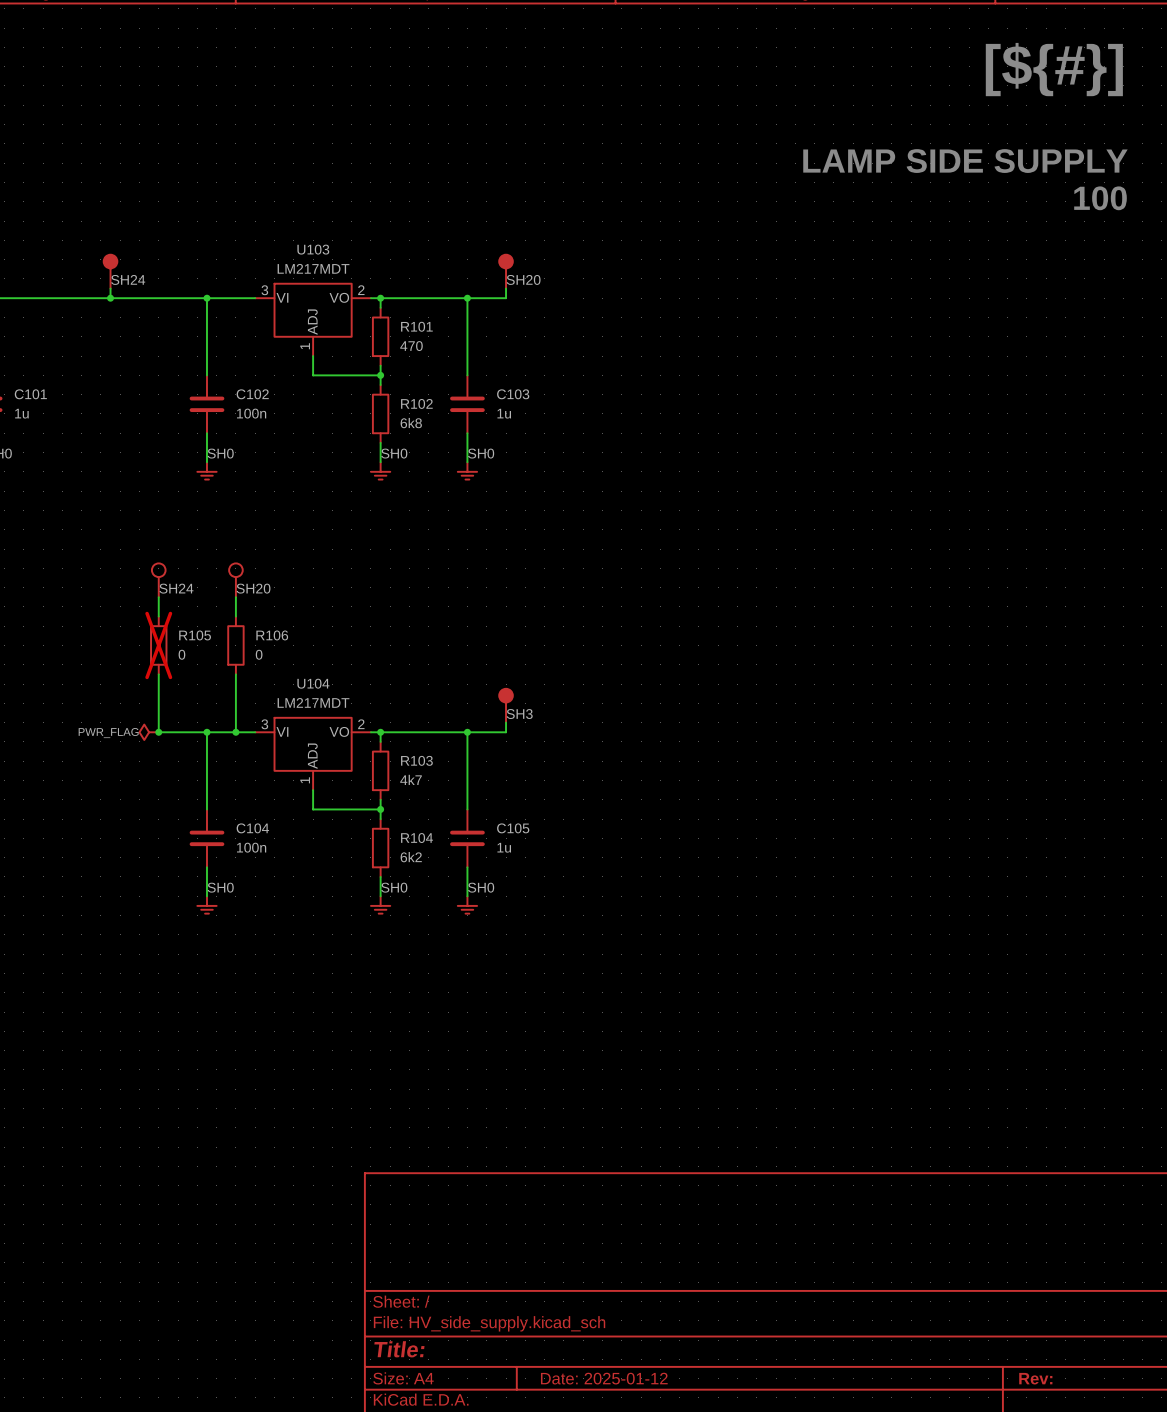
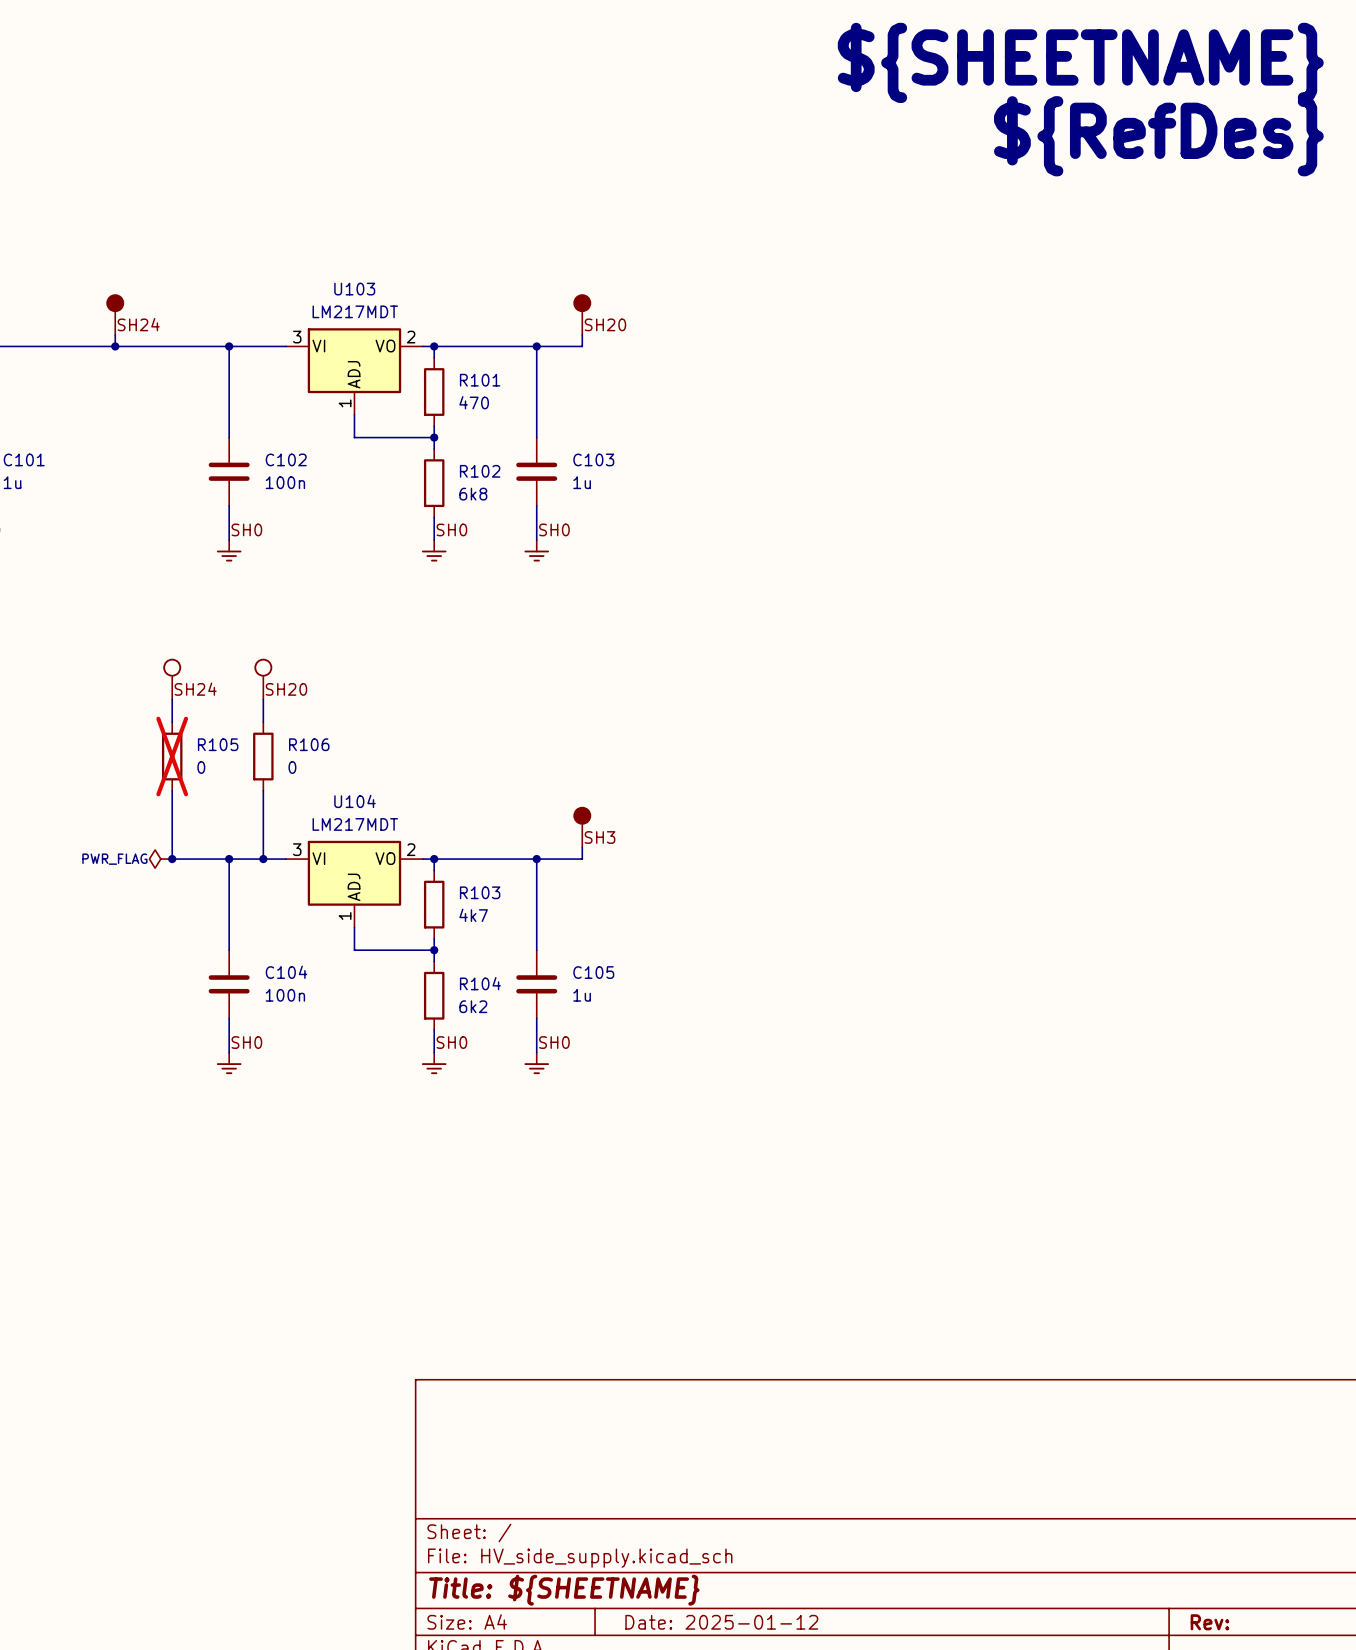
text: none -> ${SHEETNAME} (1080, 62)
text: [${#}] (1054, 69) -> none
text: none -> ${RefDes} (1158, 136)
text: LAMP SIDE SUPPLY (965, 161) -> none
text: 100 (1100, 198) -> none
title block: Title: (399, 1349) -> Title: ${SHEETNAME} (564, 1590)

